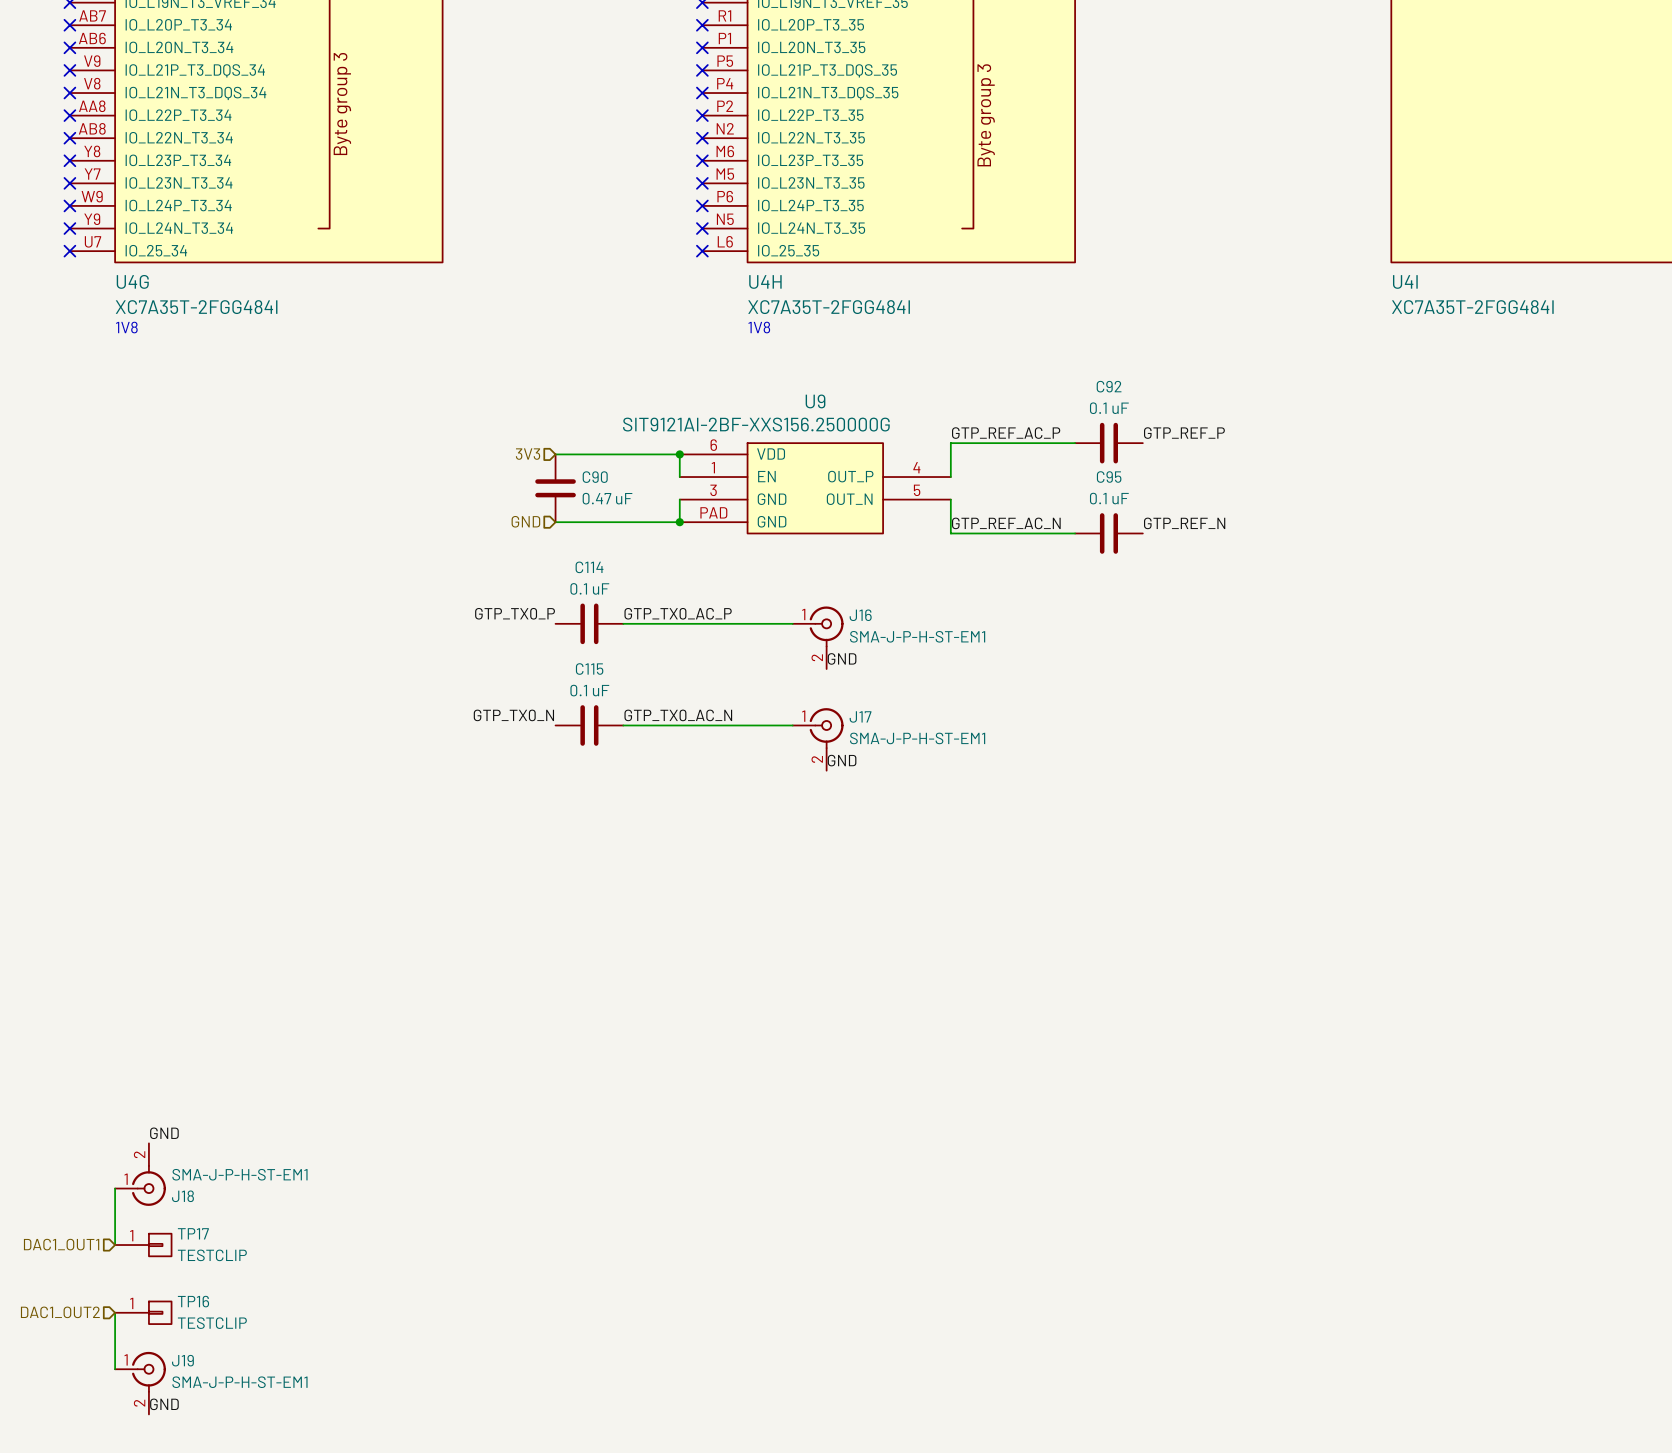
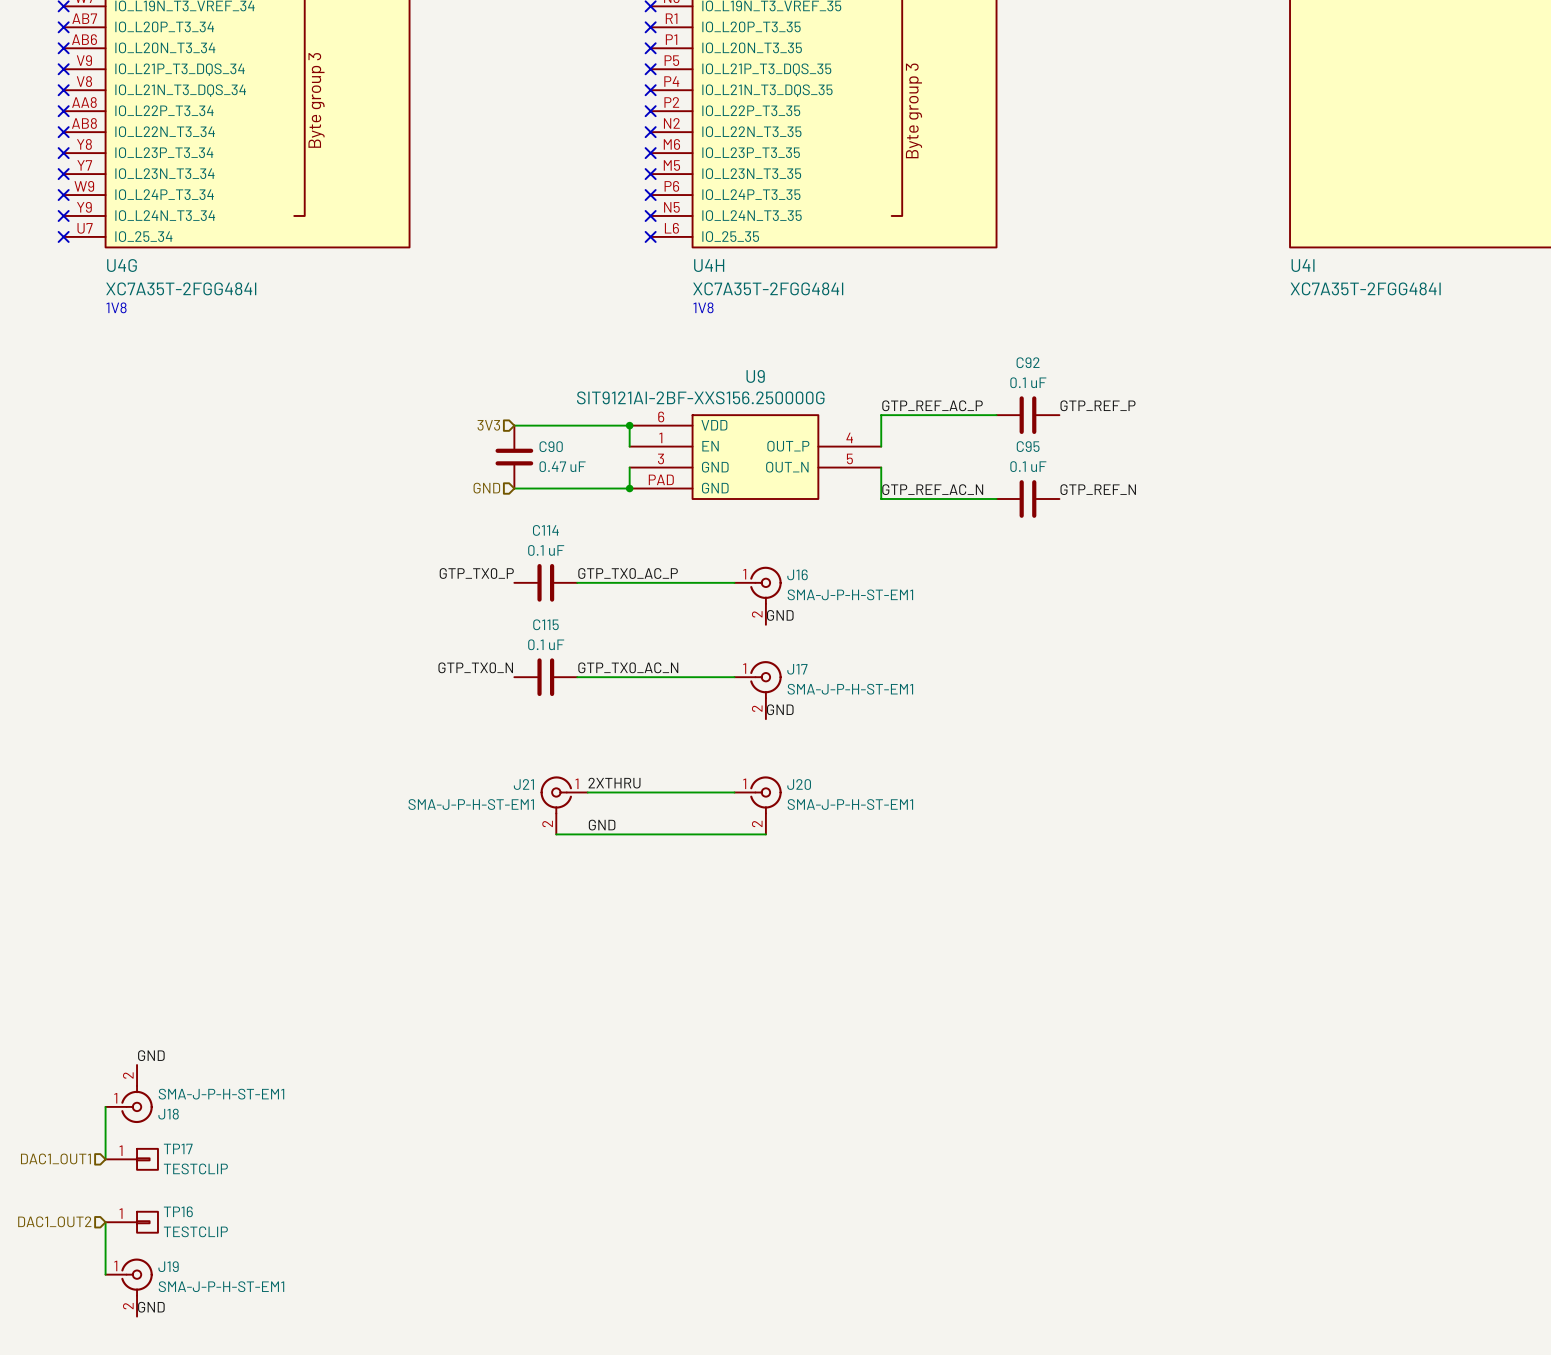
label: none -> 2XTHRU (614, 783)
wire: none -> (587, 792) (734, 792)
J21: none -> SMA-J-P-H-ST-EM1 (564, 805)
J20: none -> SMA-J-P-H-ST-EM1 (758, 805)
label: none -> GND (602, 825)
wire: none -> (556, 834) (765, 834)

